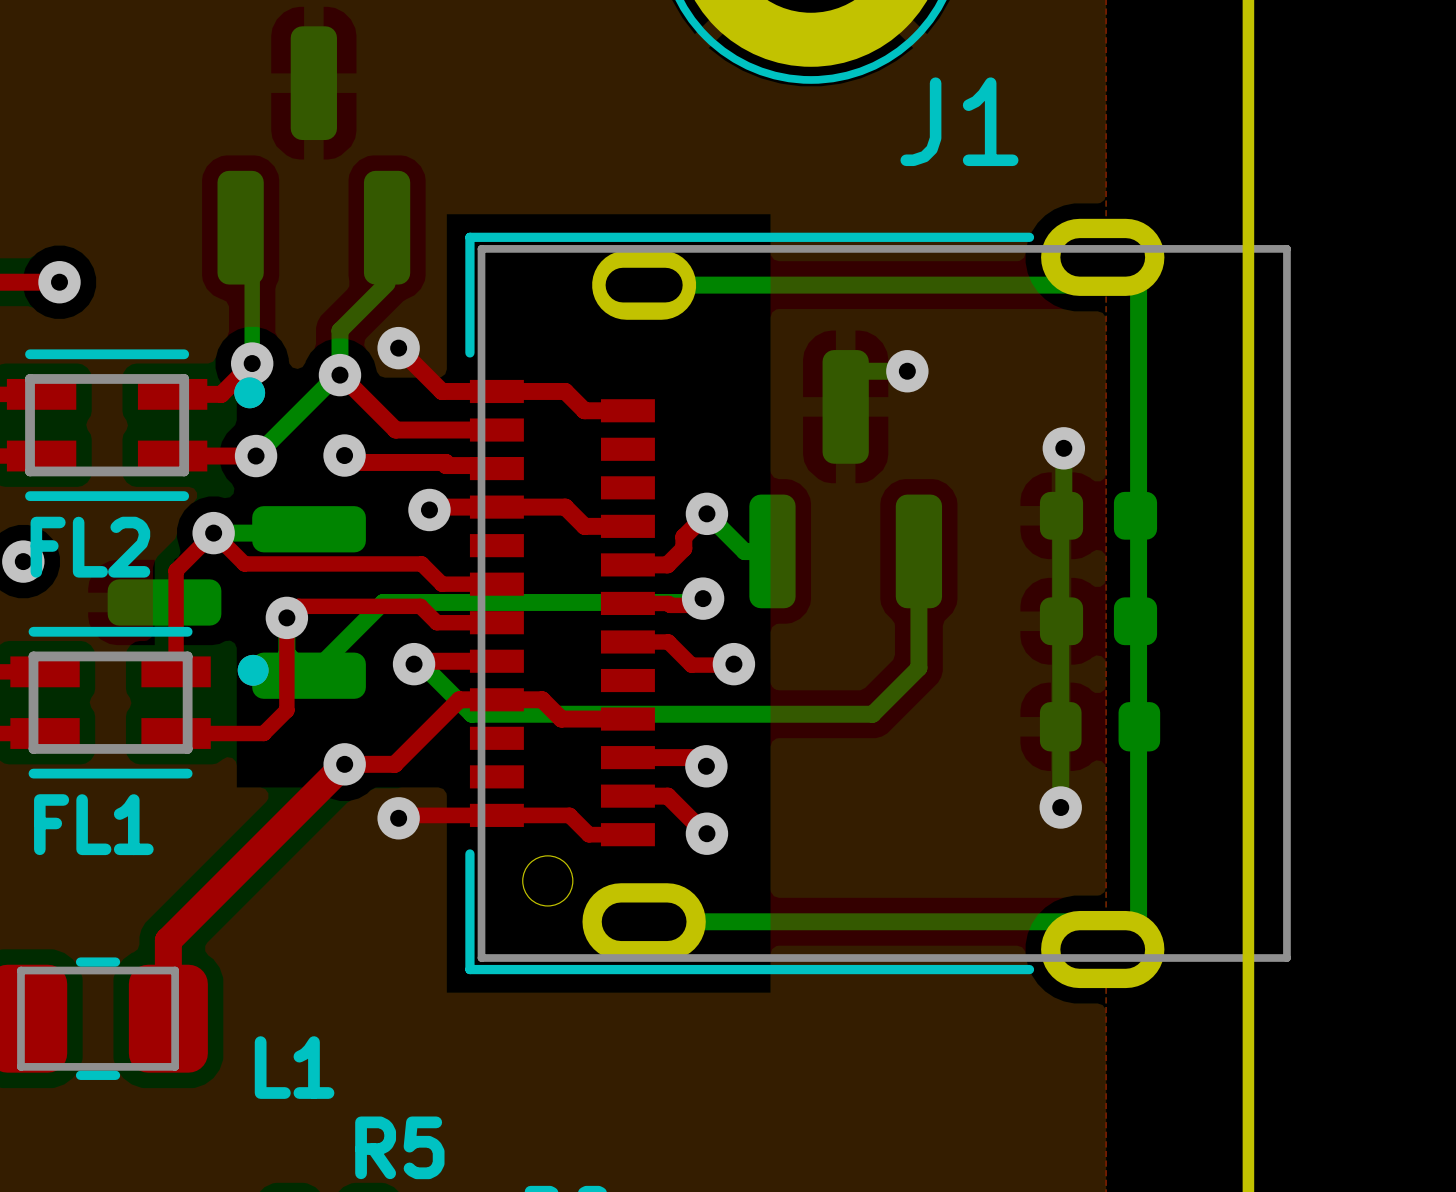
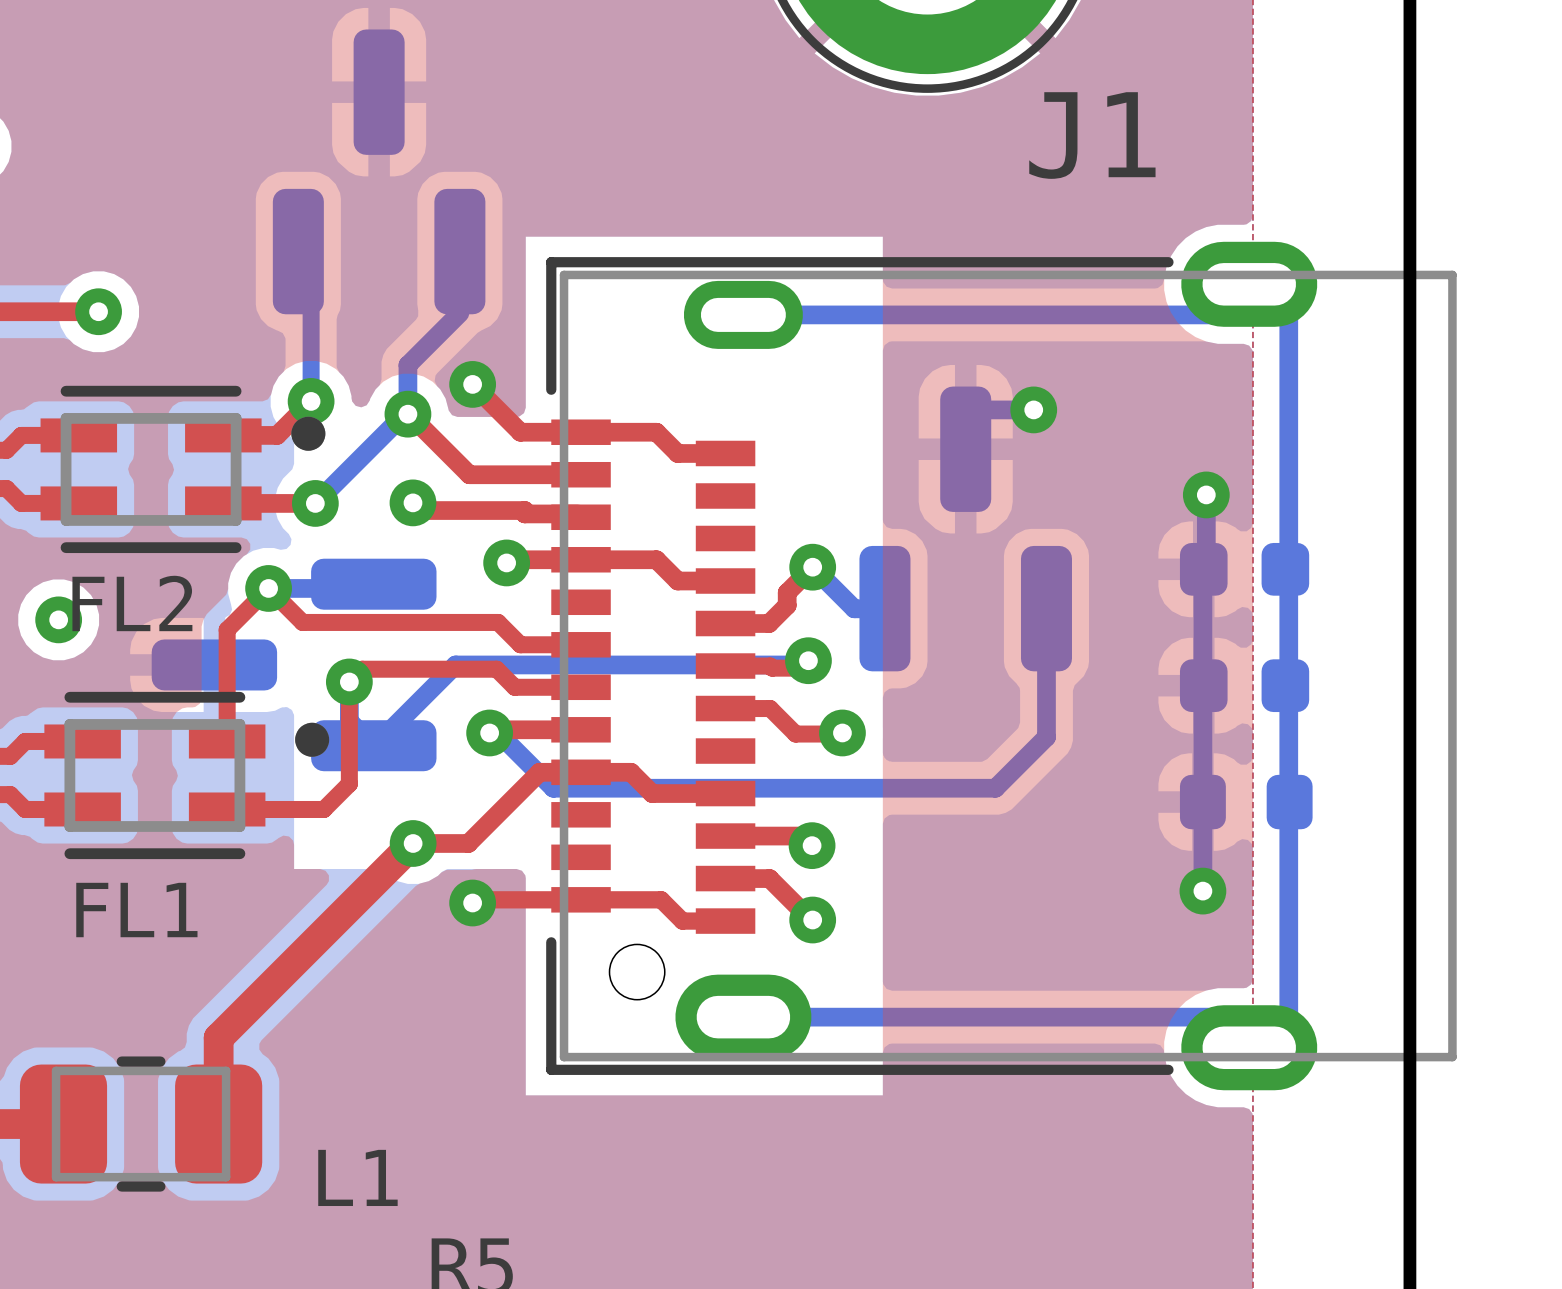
J1 footprint: [465, 218, 1291, 989] -> [546, 241, 1457, 1091]

